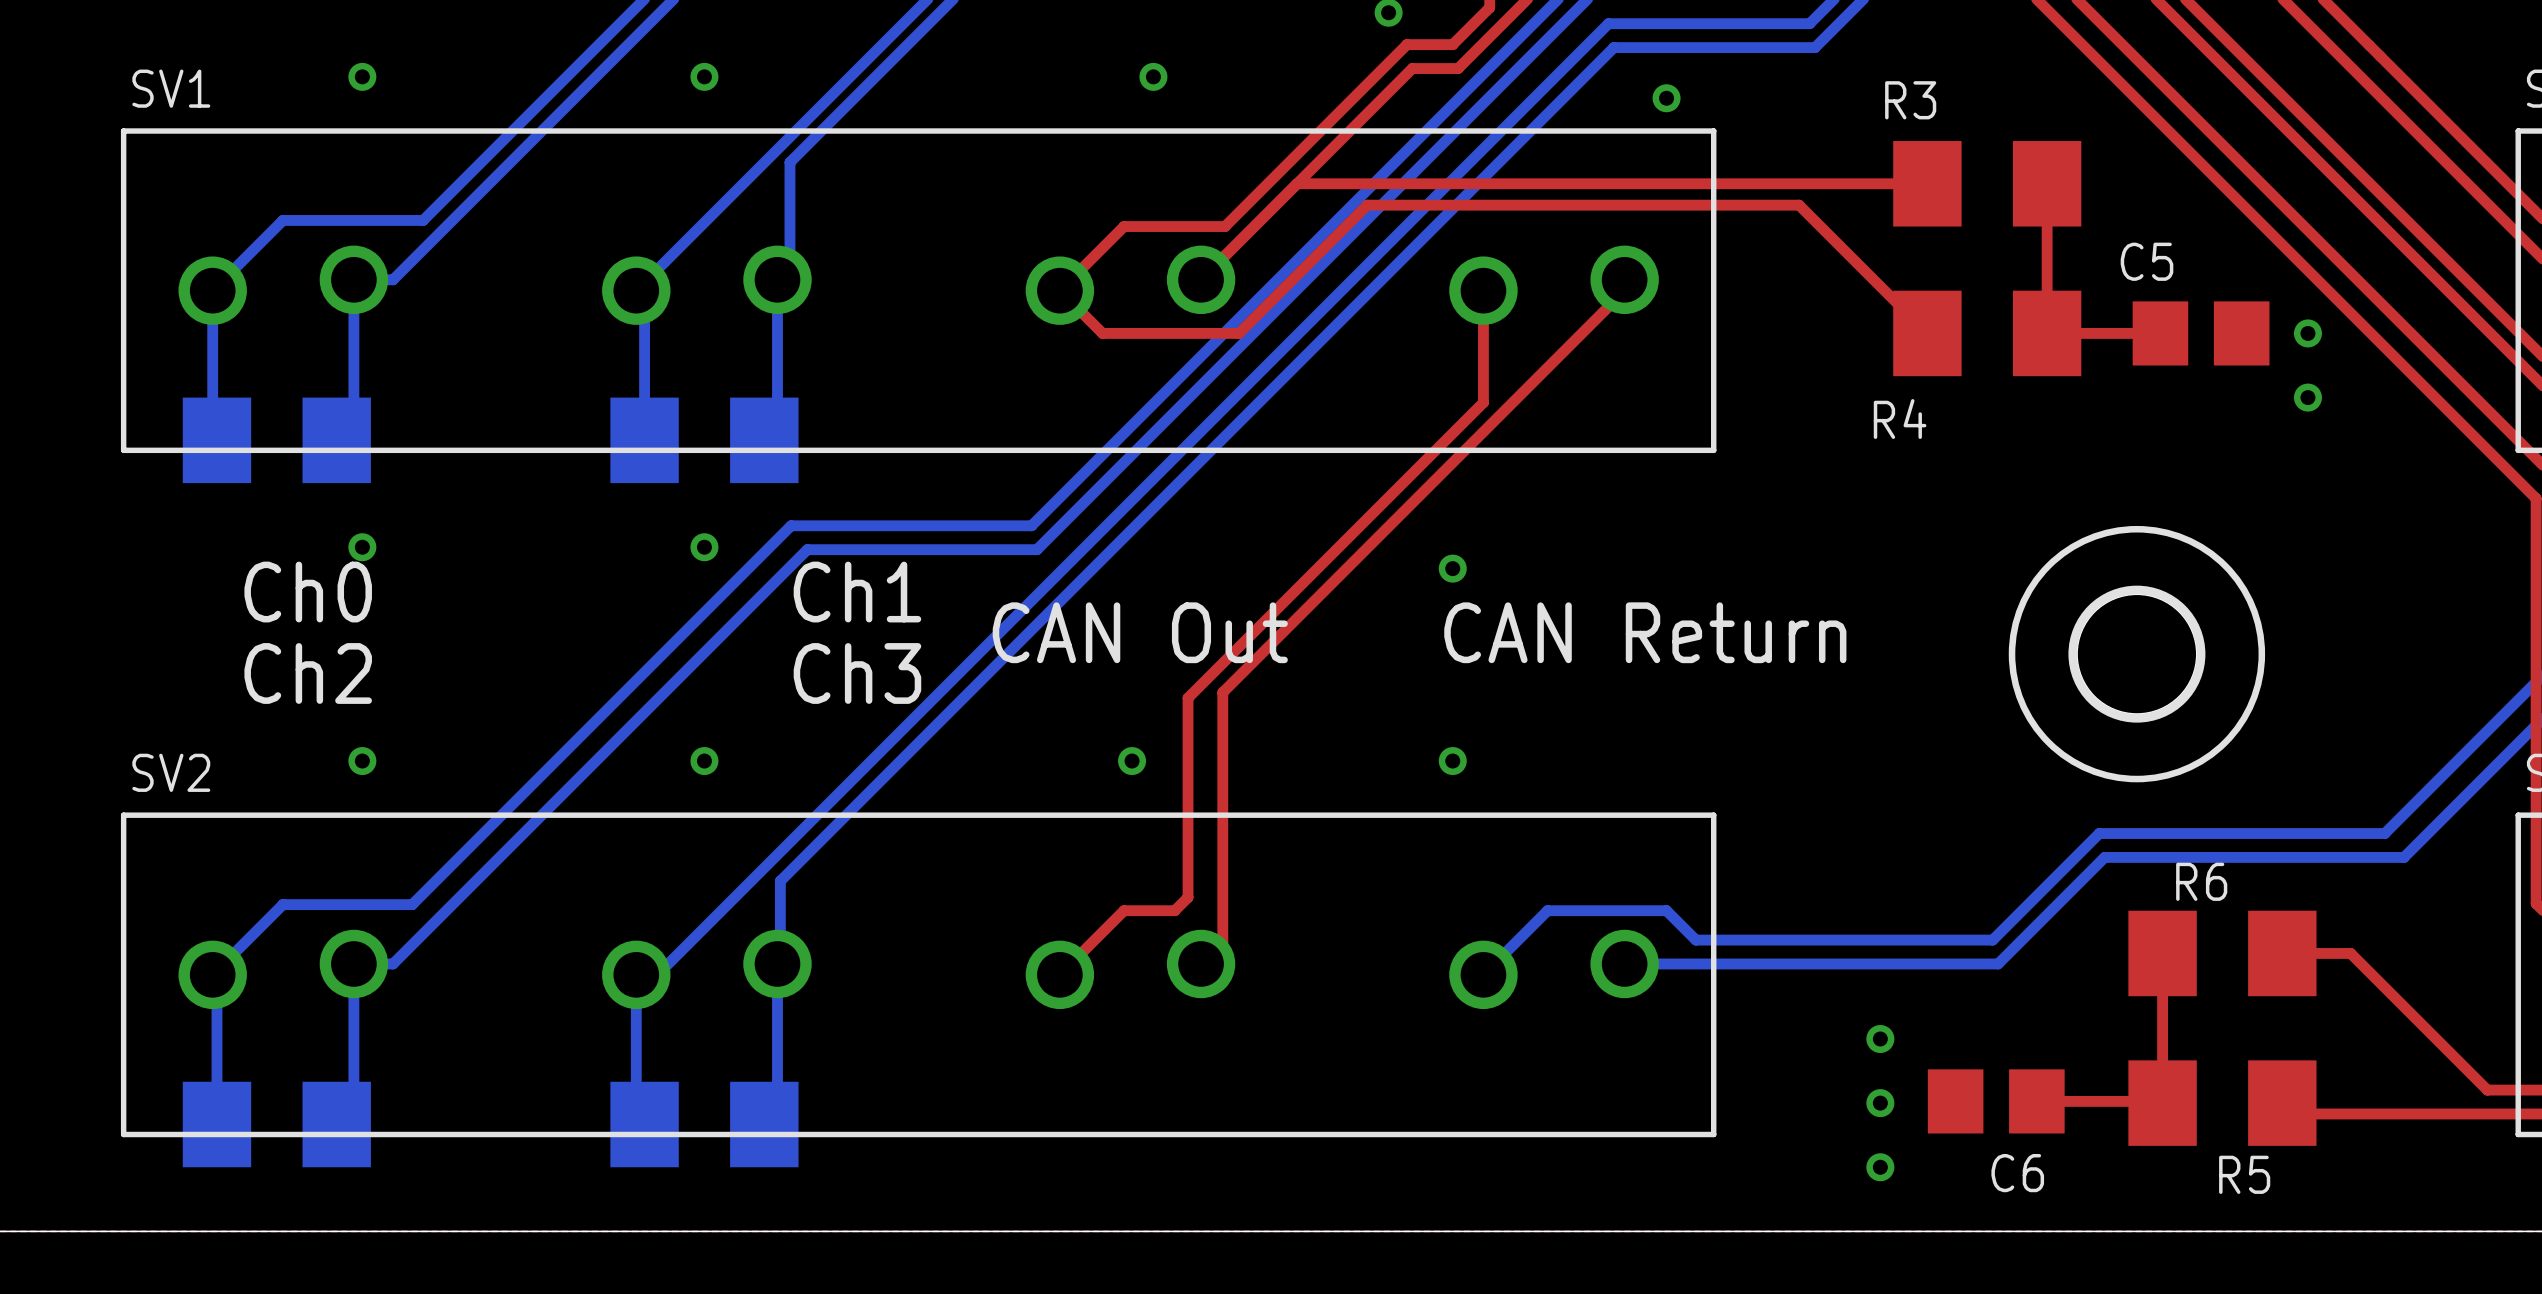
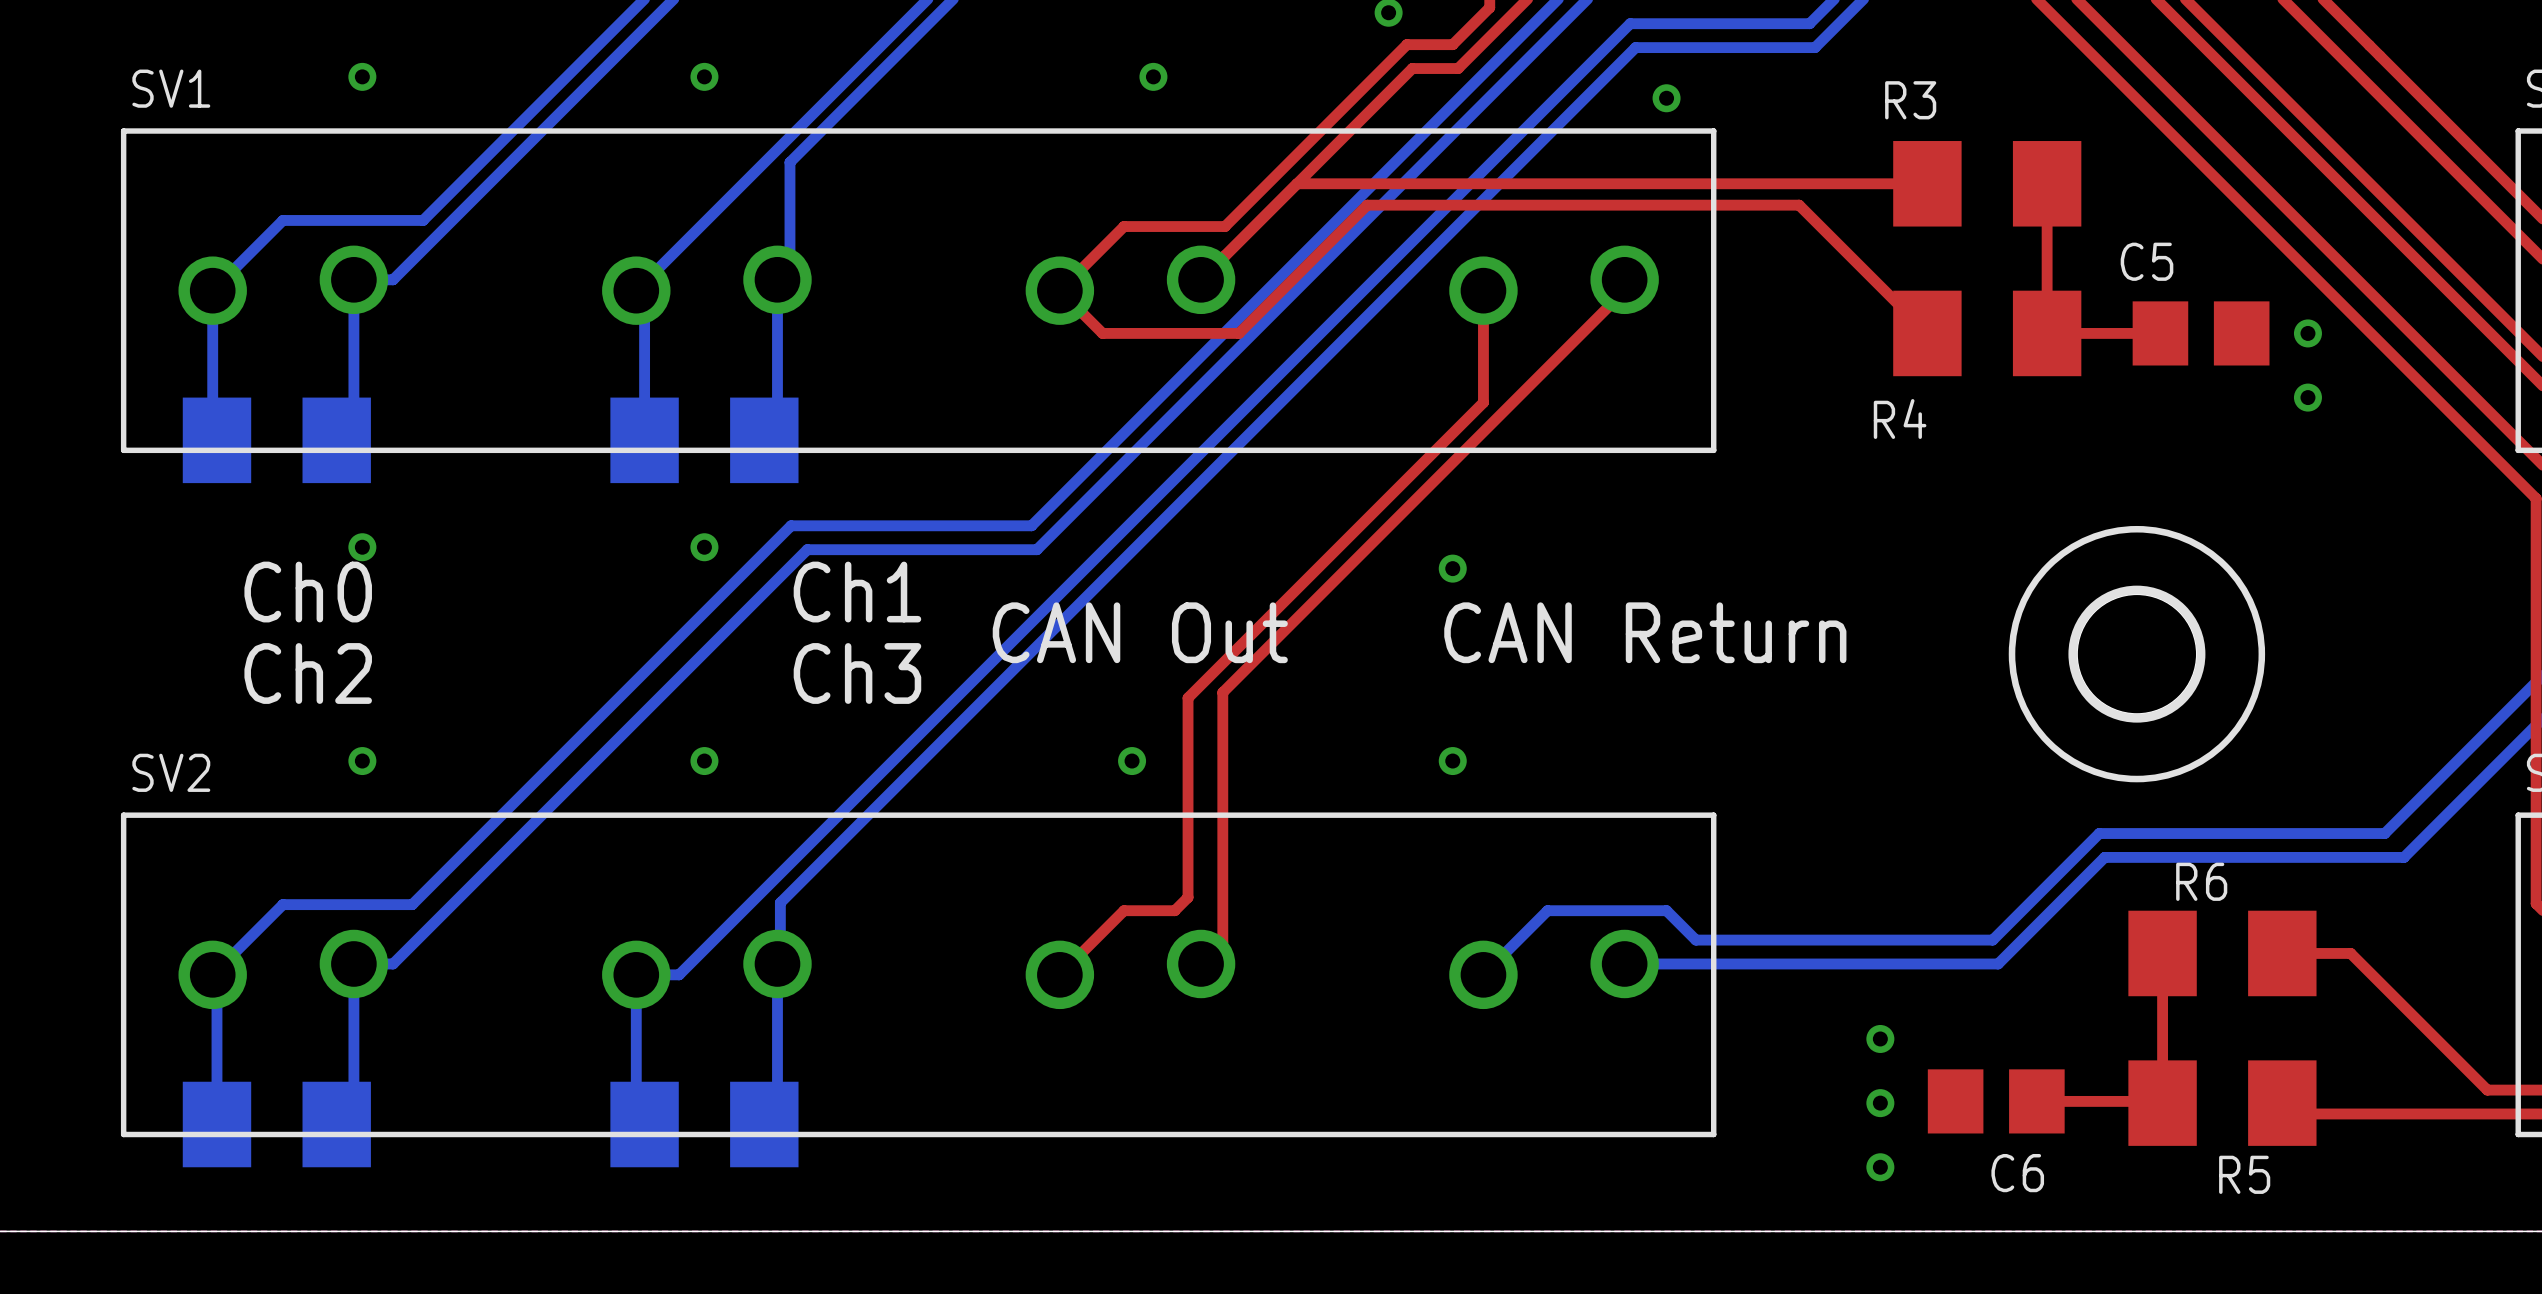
bottom track: (1630, 23) (1608, 23) (657, 974) -> (1630, 23) (679, 974) (657, 974)
bottom track: (1635, 47) (1613, 47) (780, 881) (780, 902) -> (1635, 47) (780, 902)

